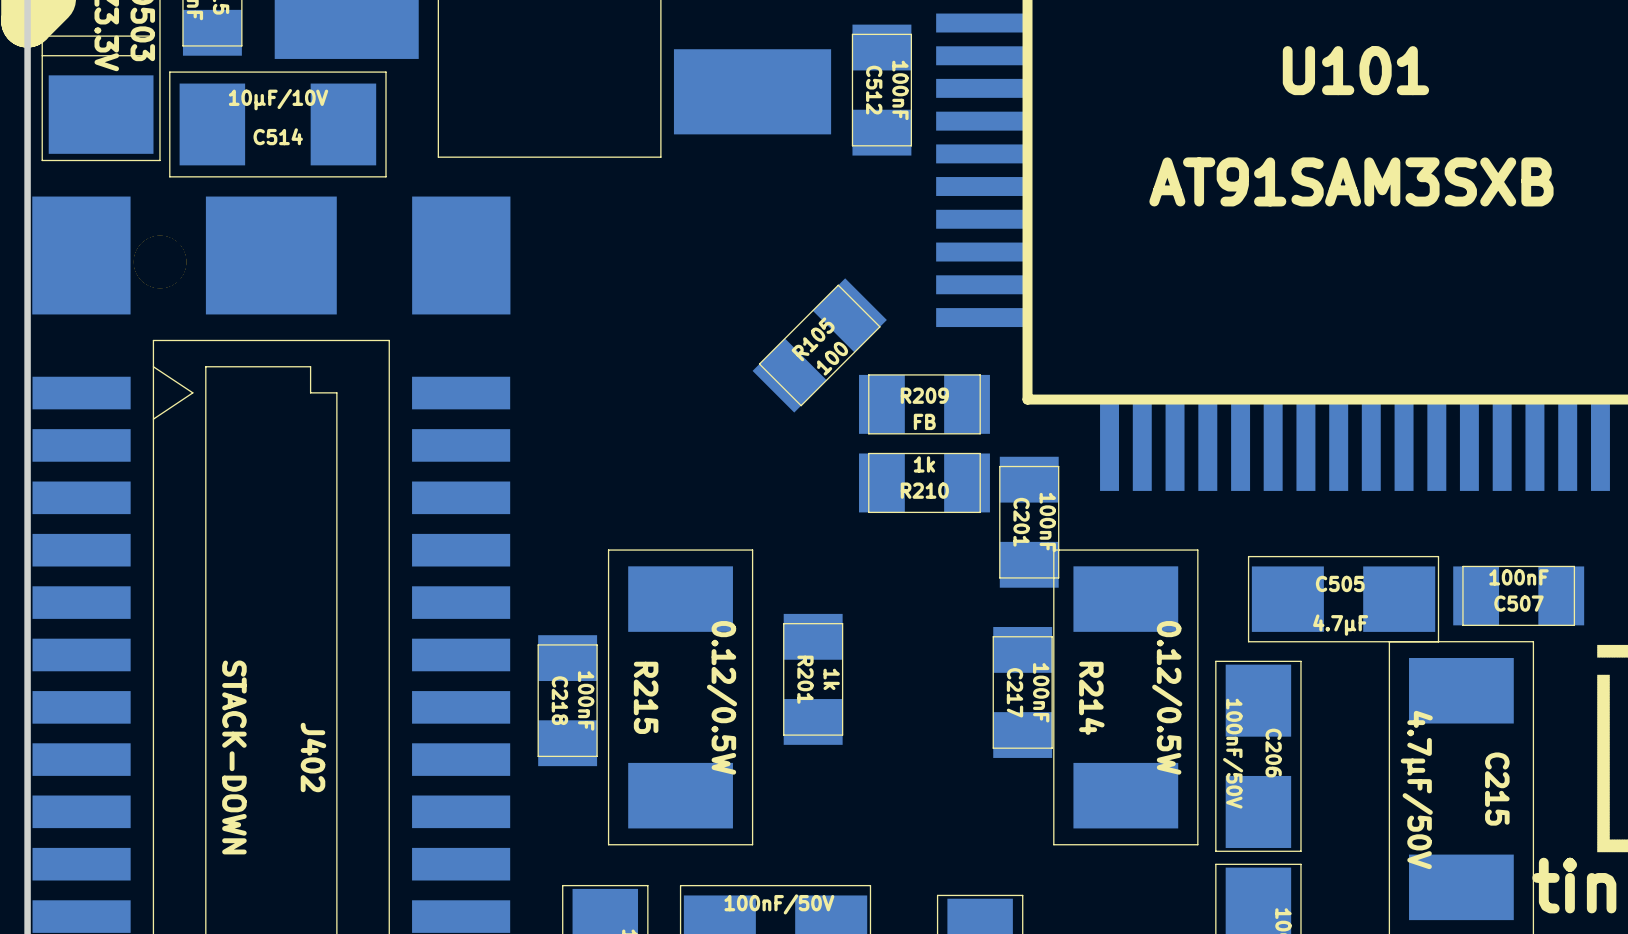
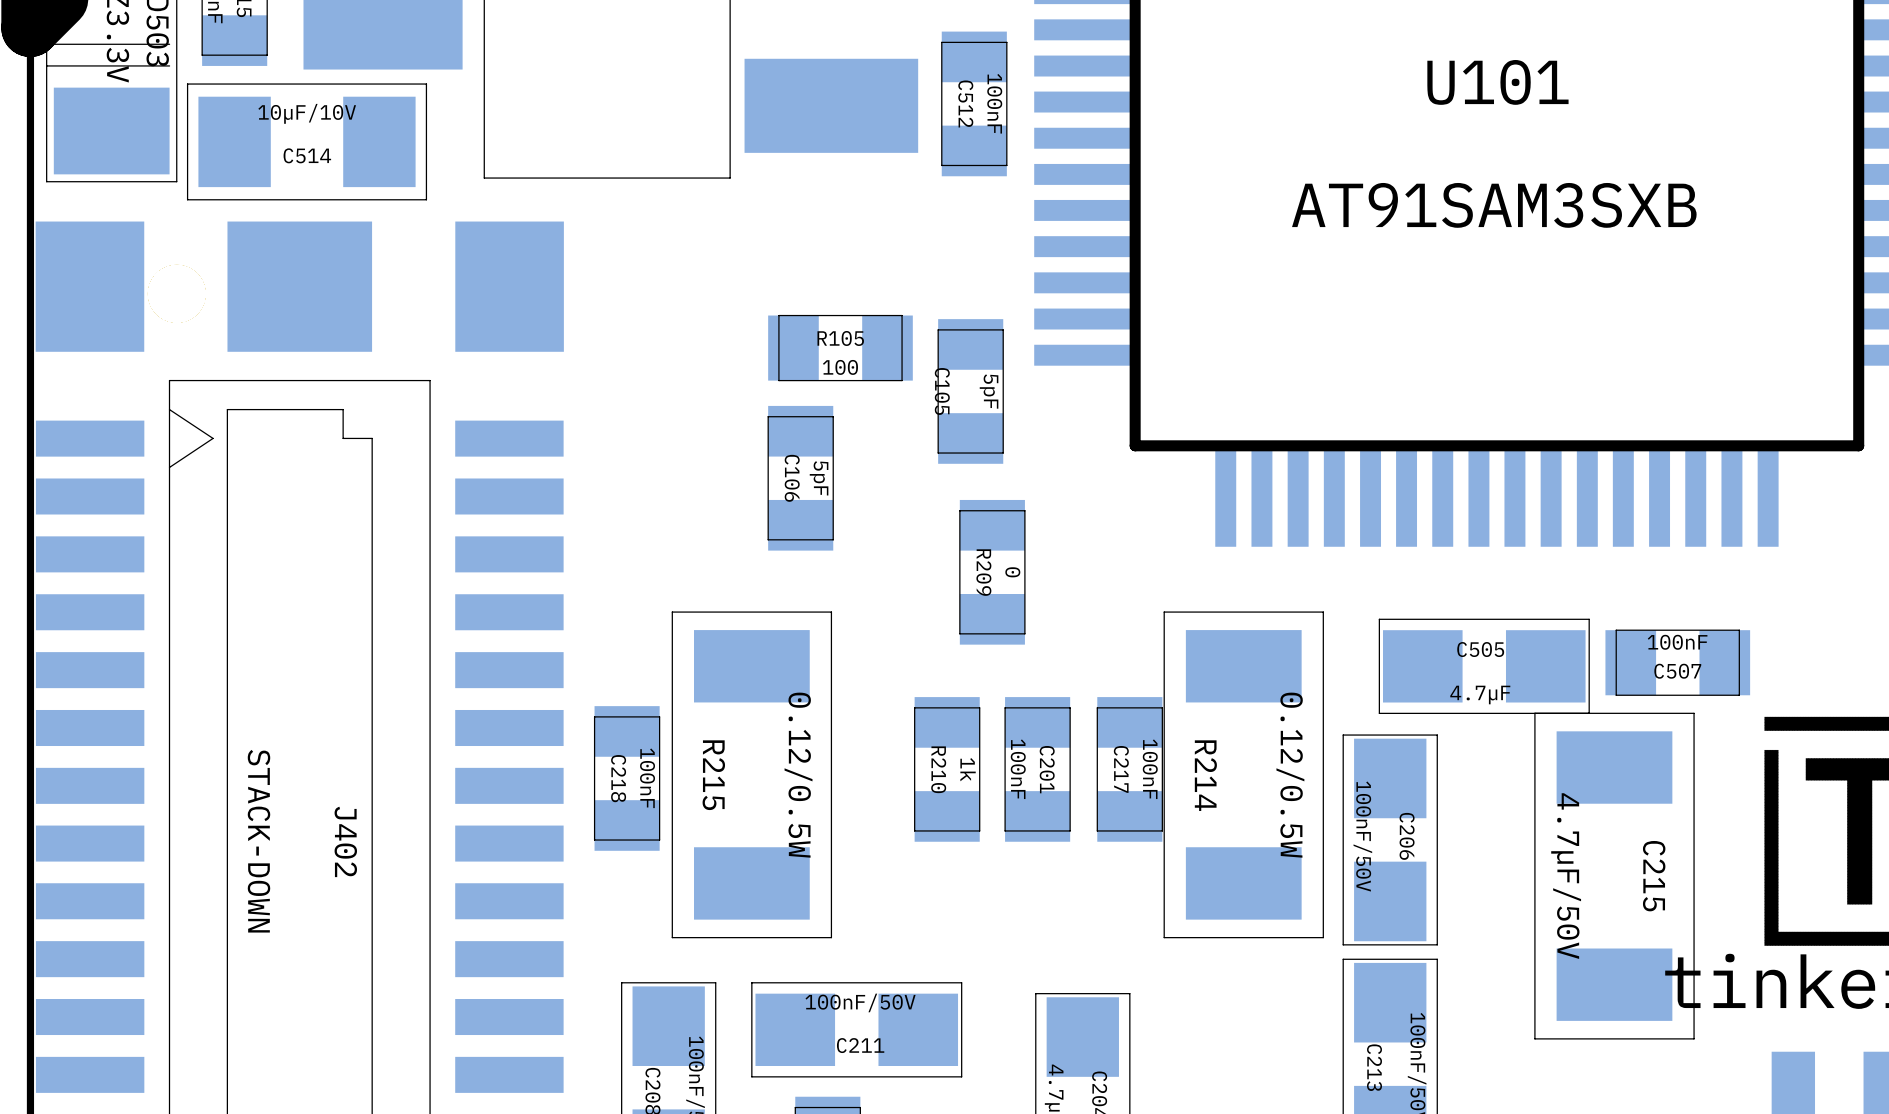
R105 rotation: 0° (819, 345) -> 45° clockwise (840, 348)
C105: none -> 5pF (970, 391)
R209 rotation: 0° (924, 404) -> 90° clockwise (992, 572)
R209 position: (924, 404) -> (992, 572)
R209 value: FB (924, 421) -> 0 (1012, 572)
C106: none -> 5pF (800, 478)
R210 rotation: 0° (924, 482) -> 90° clockwise (947, 769)
R210 position: (924, 482) -> (947, 769)
C201 name position: C201 (1021, 522) -> C201 (1047, 769)
C201 position: (1029, 522) -> (1037, 769)
C201 value position: 100nF (1047, 522) -> 100nF (1018, 769)
R201: 1k (813, 679) -> none

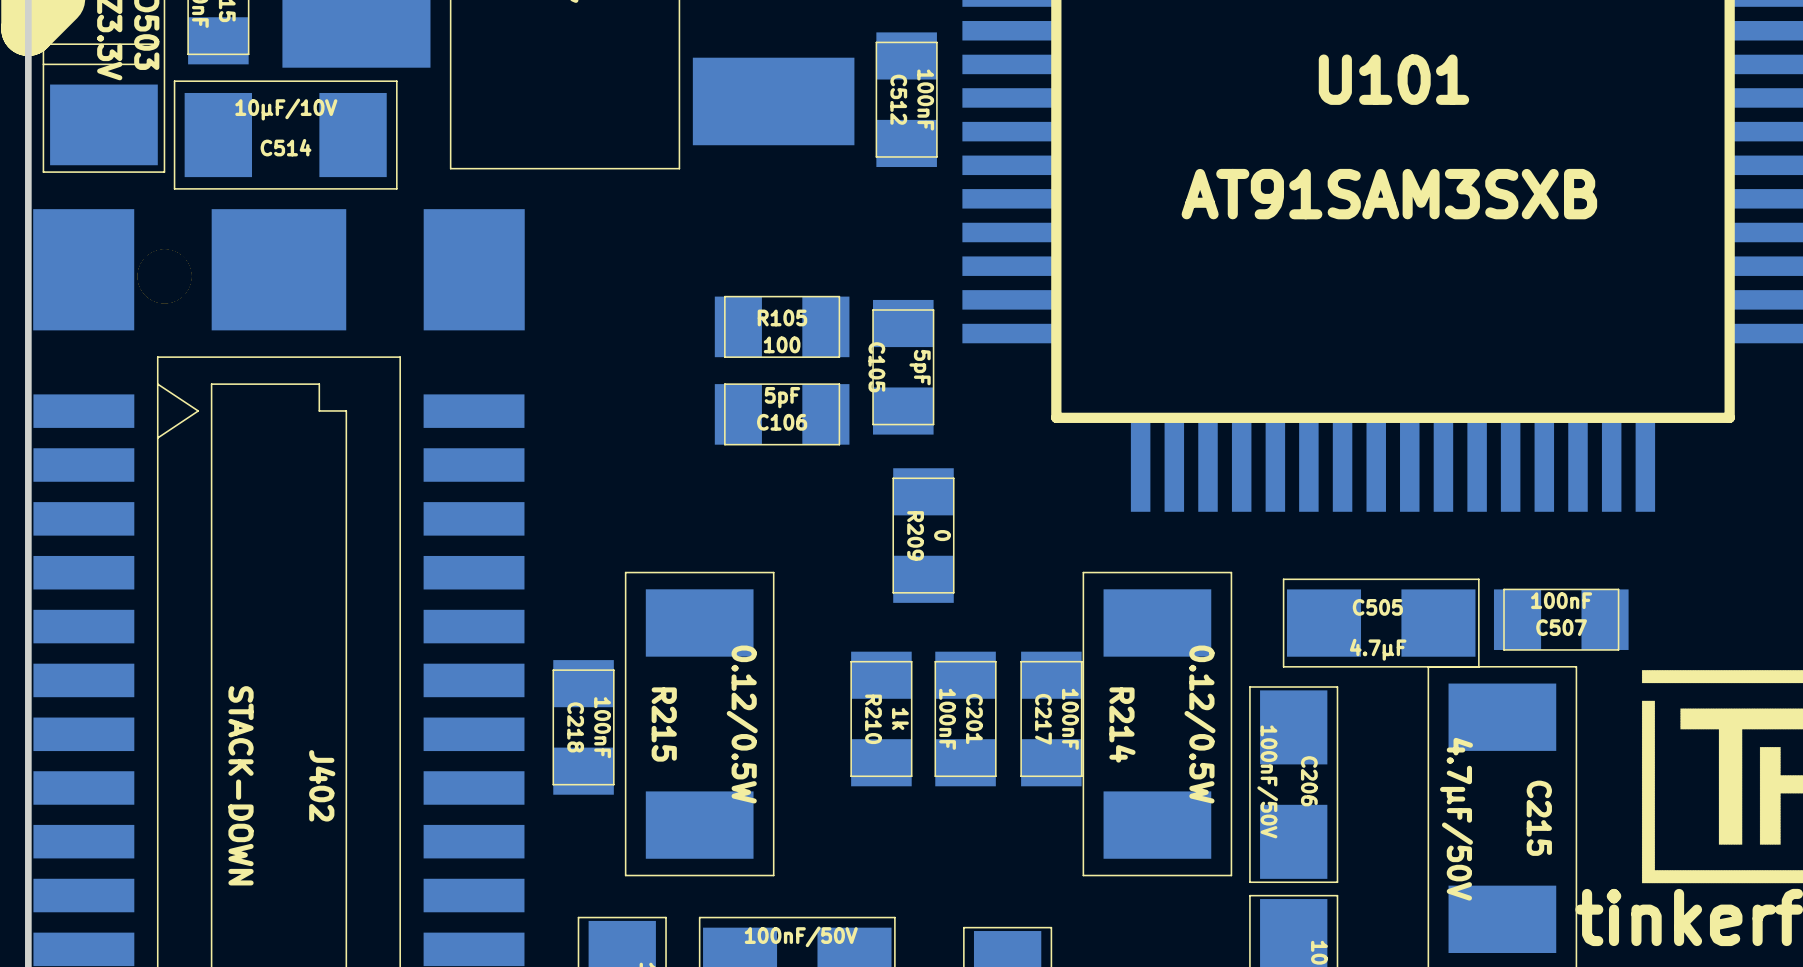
C106 rotation: 0° (800, 478) -> 90° clockwise (782, 414)

